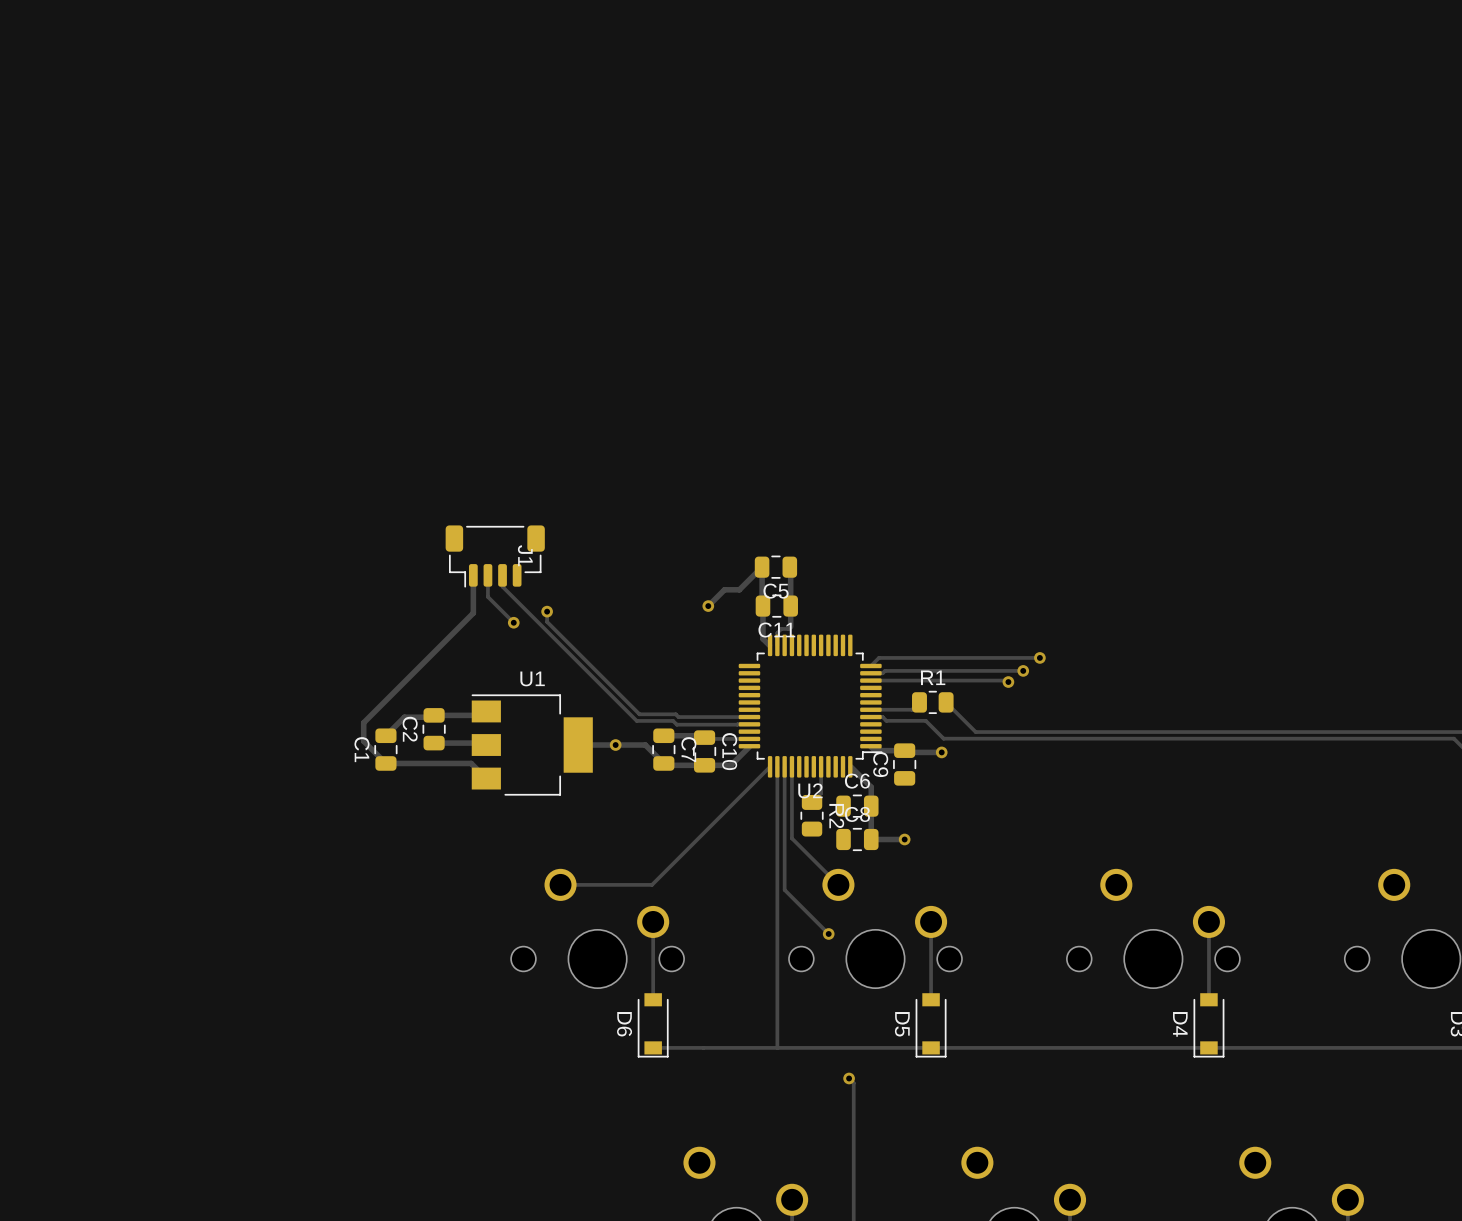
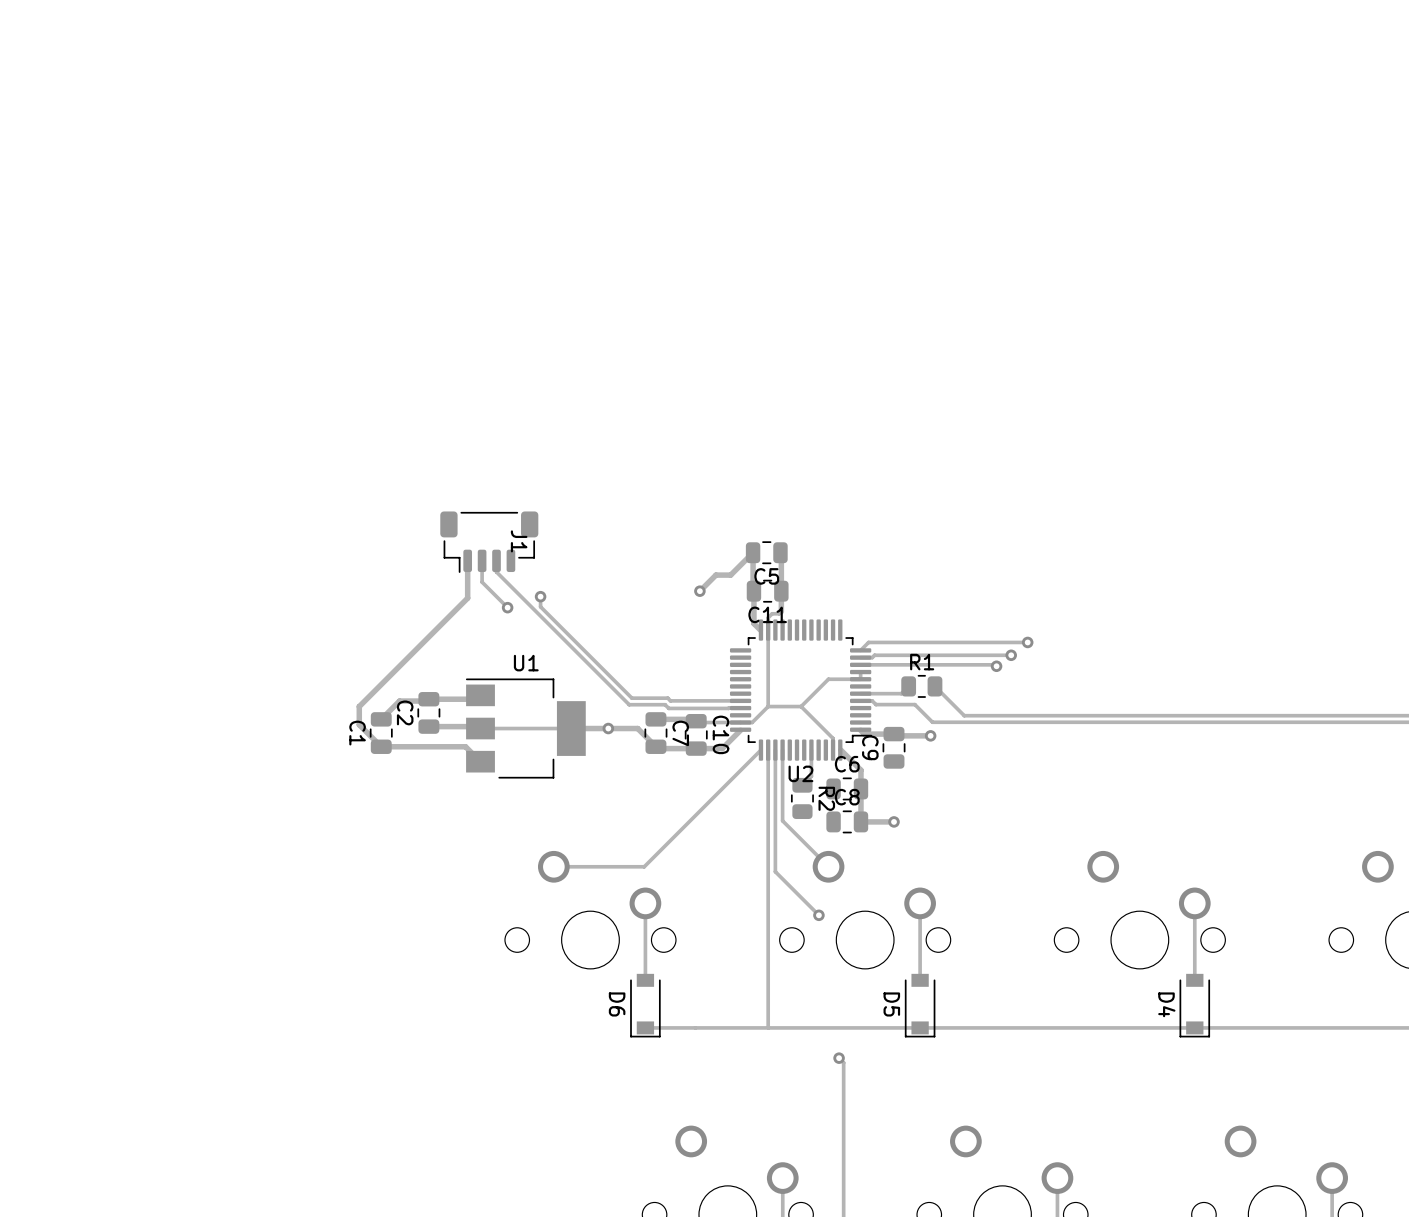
track: none -> (768, 630) (768, 706)
track: none -> (860, 672) (860, 679) (828, 679) (801, 706)
track: none -> (768, 706) (752, 722) (740, 722)
track: none -> (801, 706) (833, 738) (833, 750)
track: none -> (801, 706) (768, 706)
track: none -> (571, 728) (480, 728)

